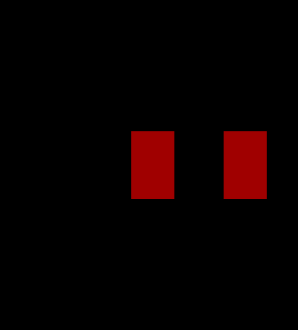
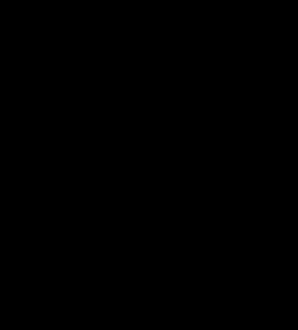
part: (198, 165) -> none

